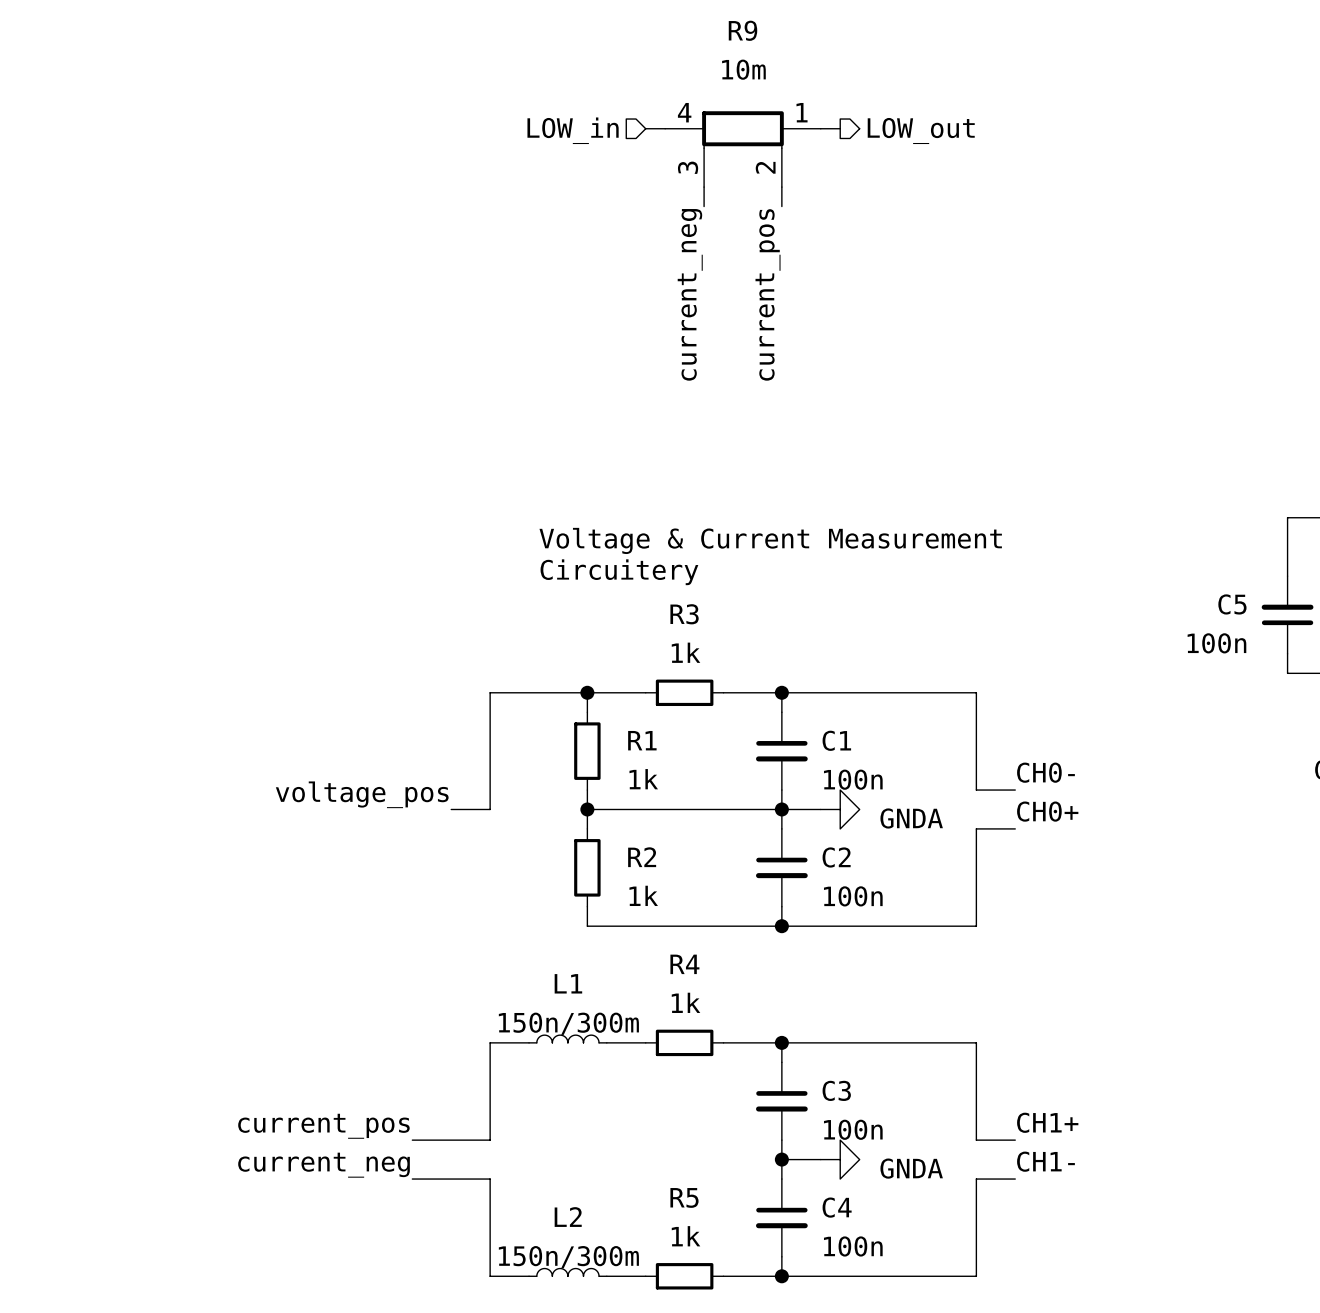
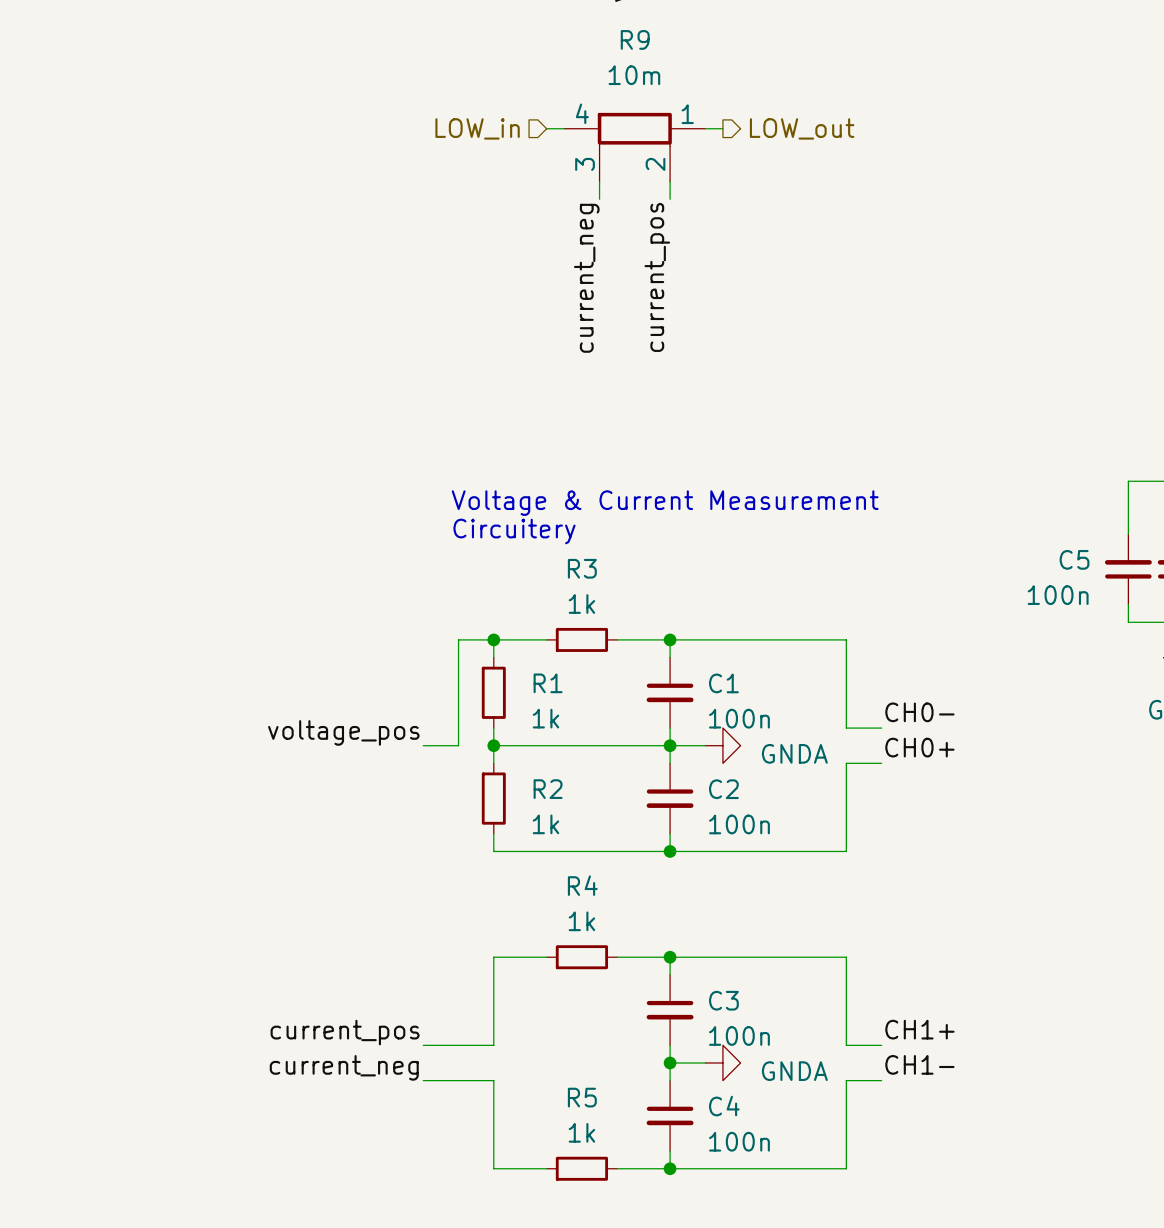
wire: (548, 692) (490, 692) (490, 809) (451, 809) -> (458, 639) (458, 745) (423, 745)
label position: voltage_pos (362, 794) -> voltage_pos (343, 732)
L1: 150n/300m (567, 1039) -> none
wire: (529, 1042) (490, 1042) (490, 1140) (412, 1140) -> none
wire: none -> (511, 957) (493, 957) (493, 1045) (423, 1045)
label position: current_pos (323, 1126) -> current_pos (345, 1032)
label position: current_neg (324, 1165) -> current_neg (344, 1067)
wire: (412, 1179) (490, 1179) (490, 1276) (529, 1276) -> none
wire: none -> (423, 1080) (493, 1080) (493, 1168) (511, 1168)
L2: 150n/300m (567, 1272) -> none

